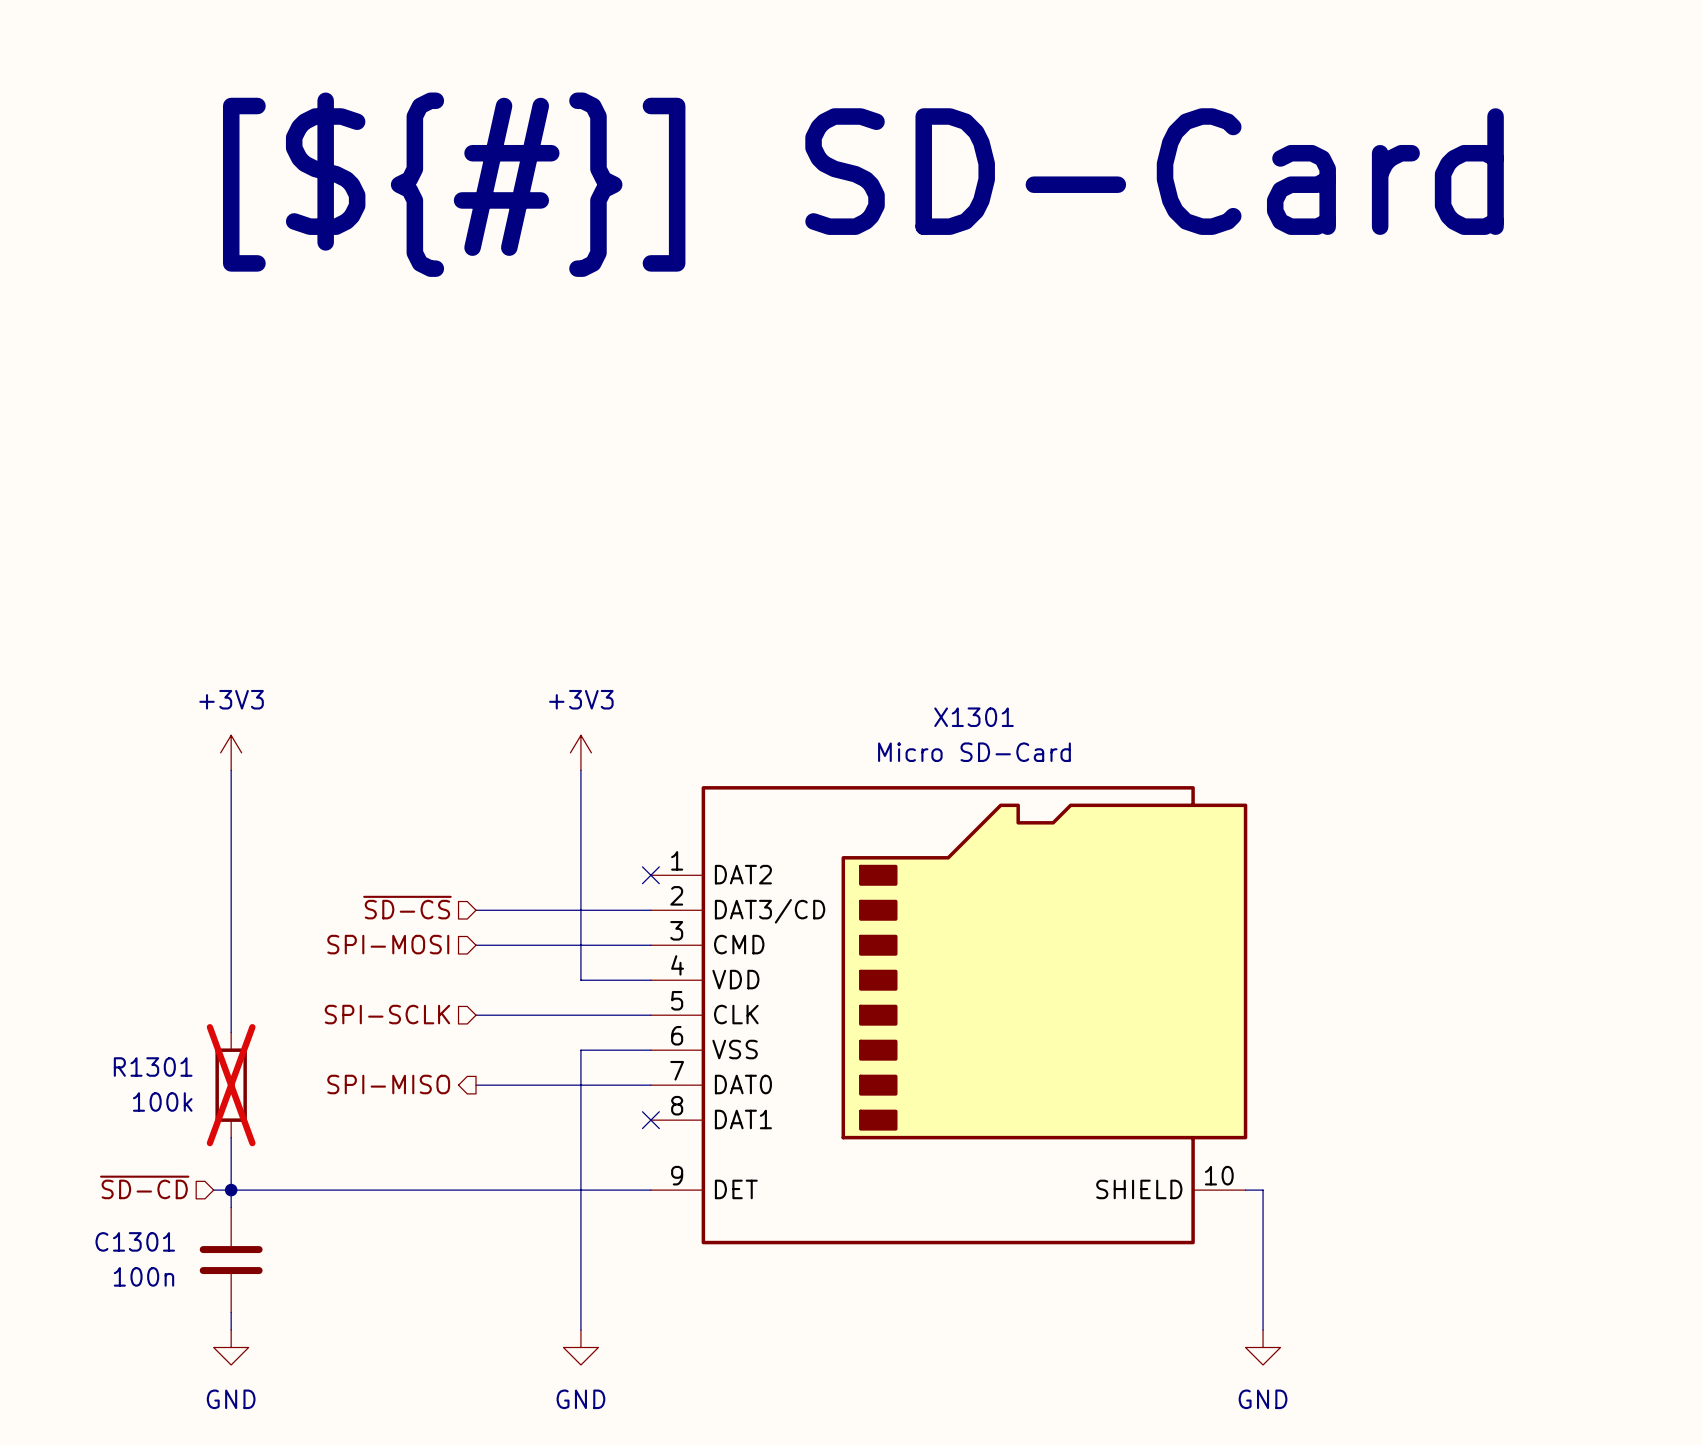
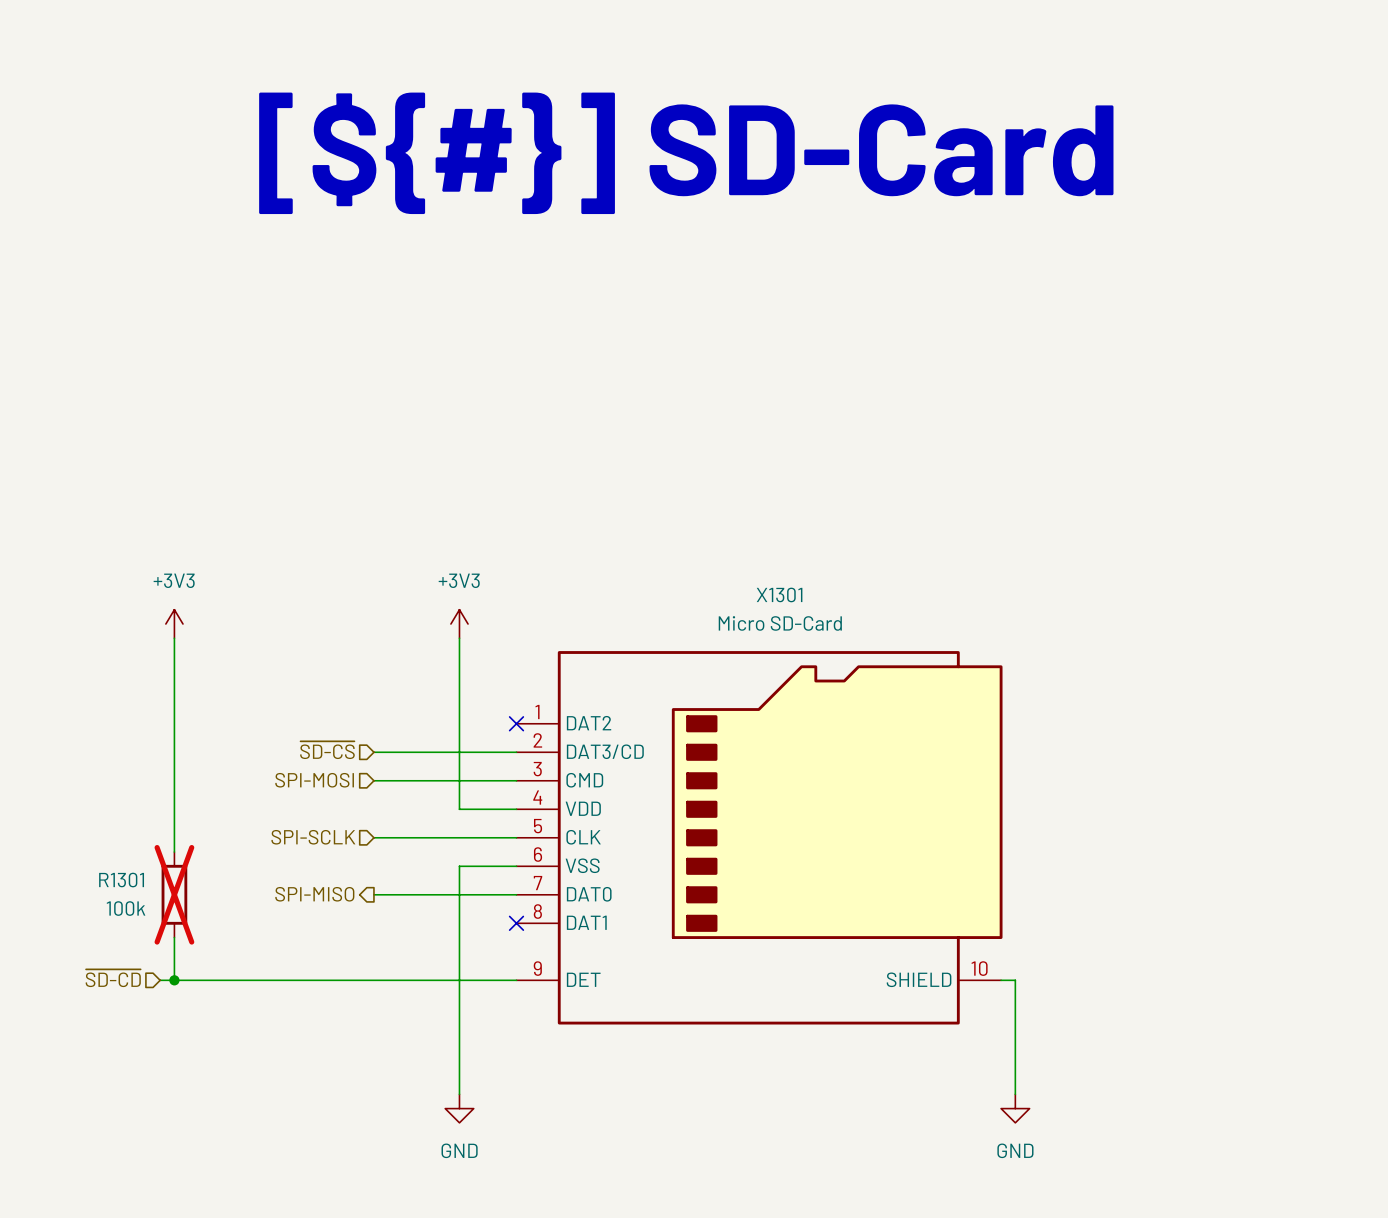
wire: (231, 1190) (231, 1207) -> none
C1301: 100n (231, 1260) -> none
wire: (231, 1312) (231, 1330) -> none
power symbol: GND (231, 1347) -> none

